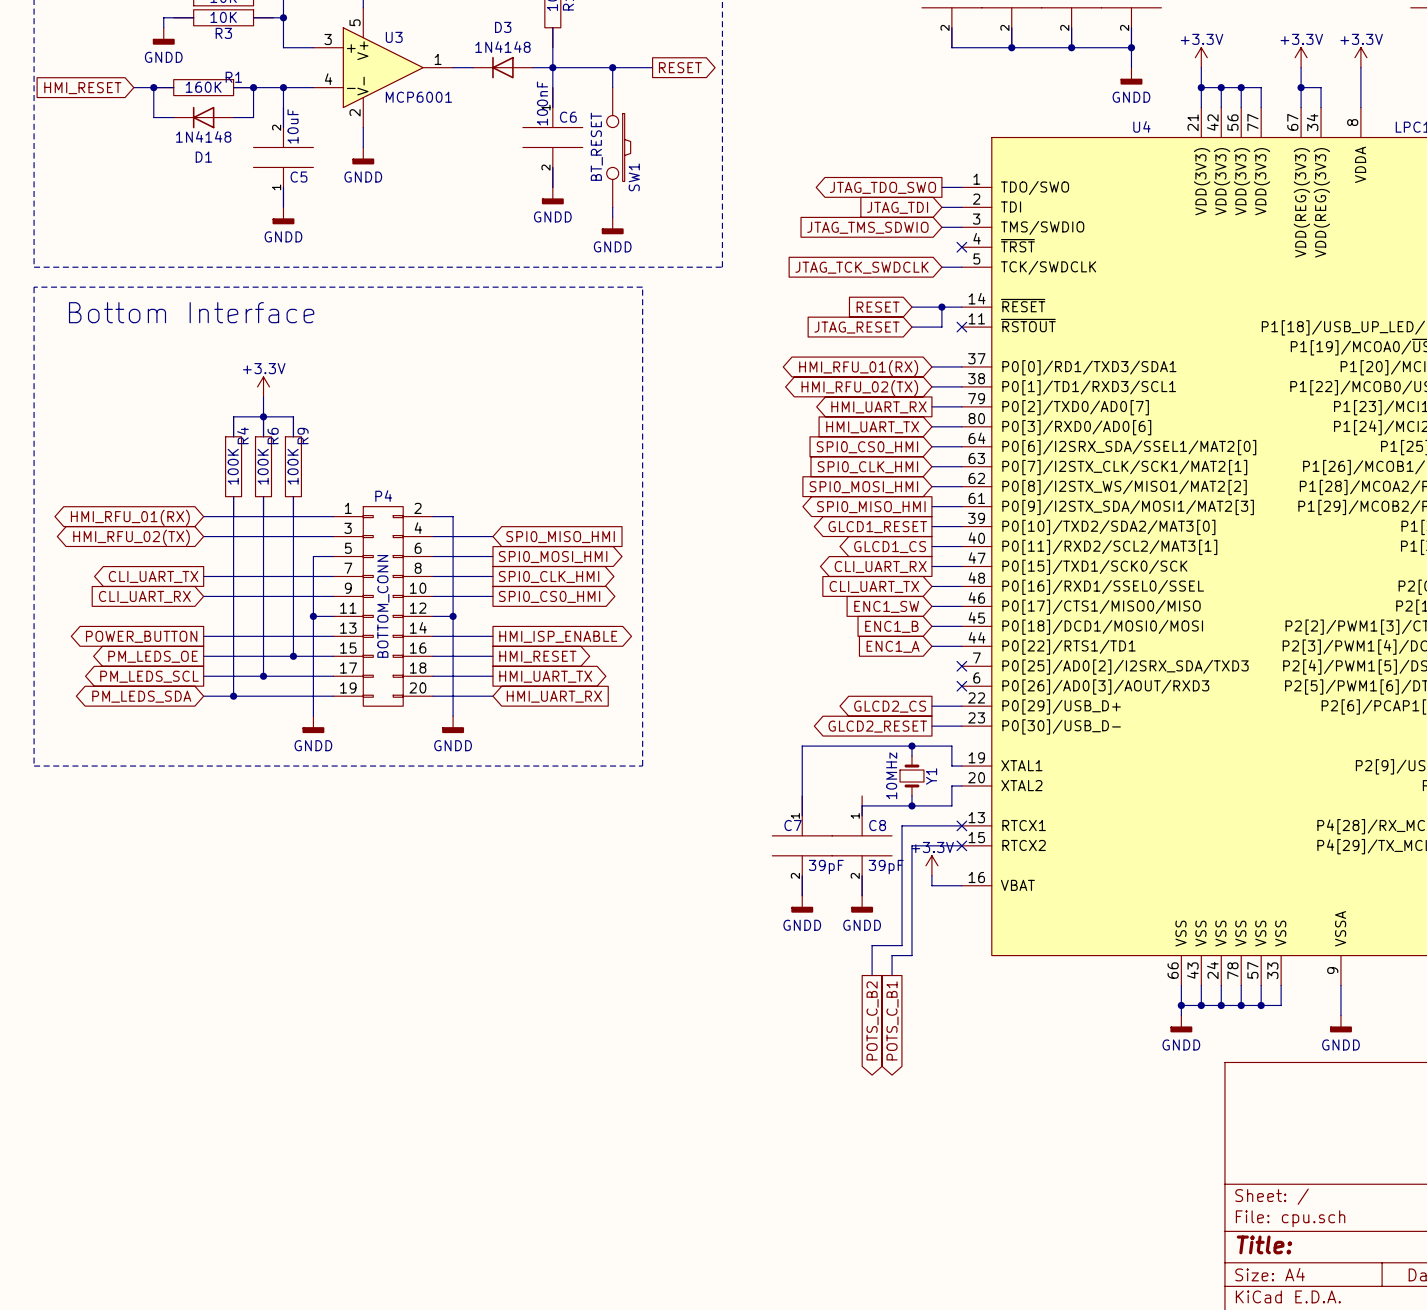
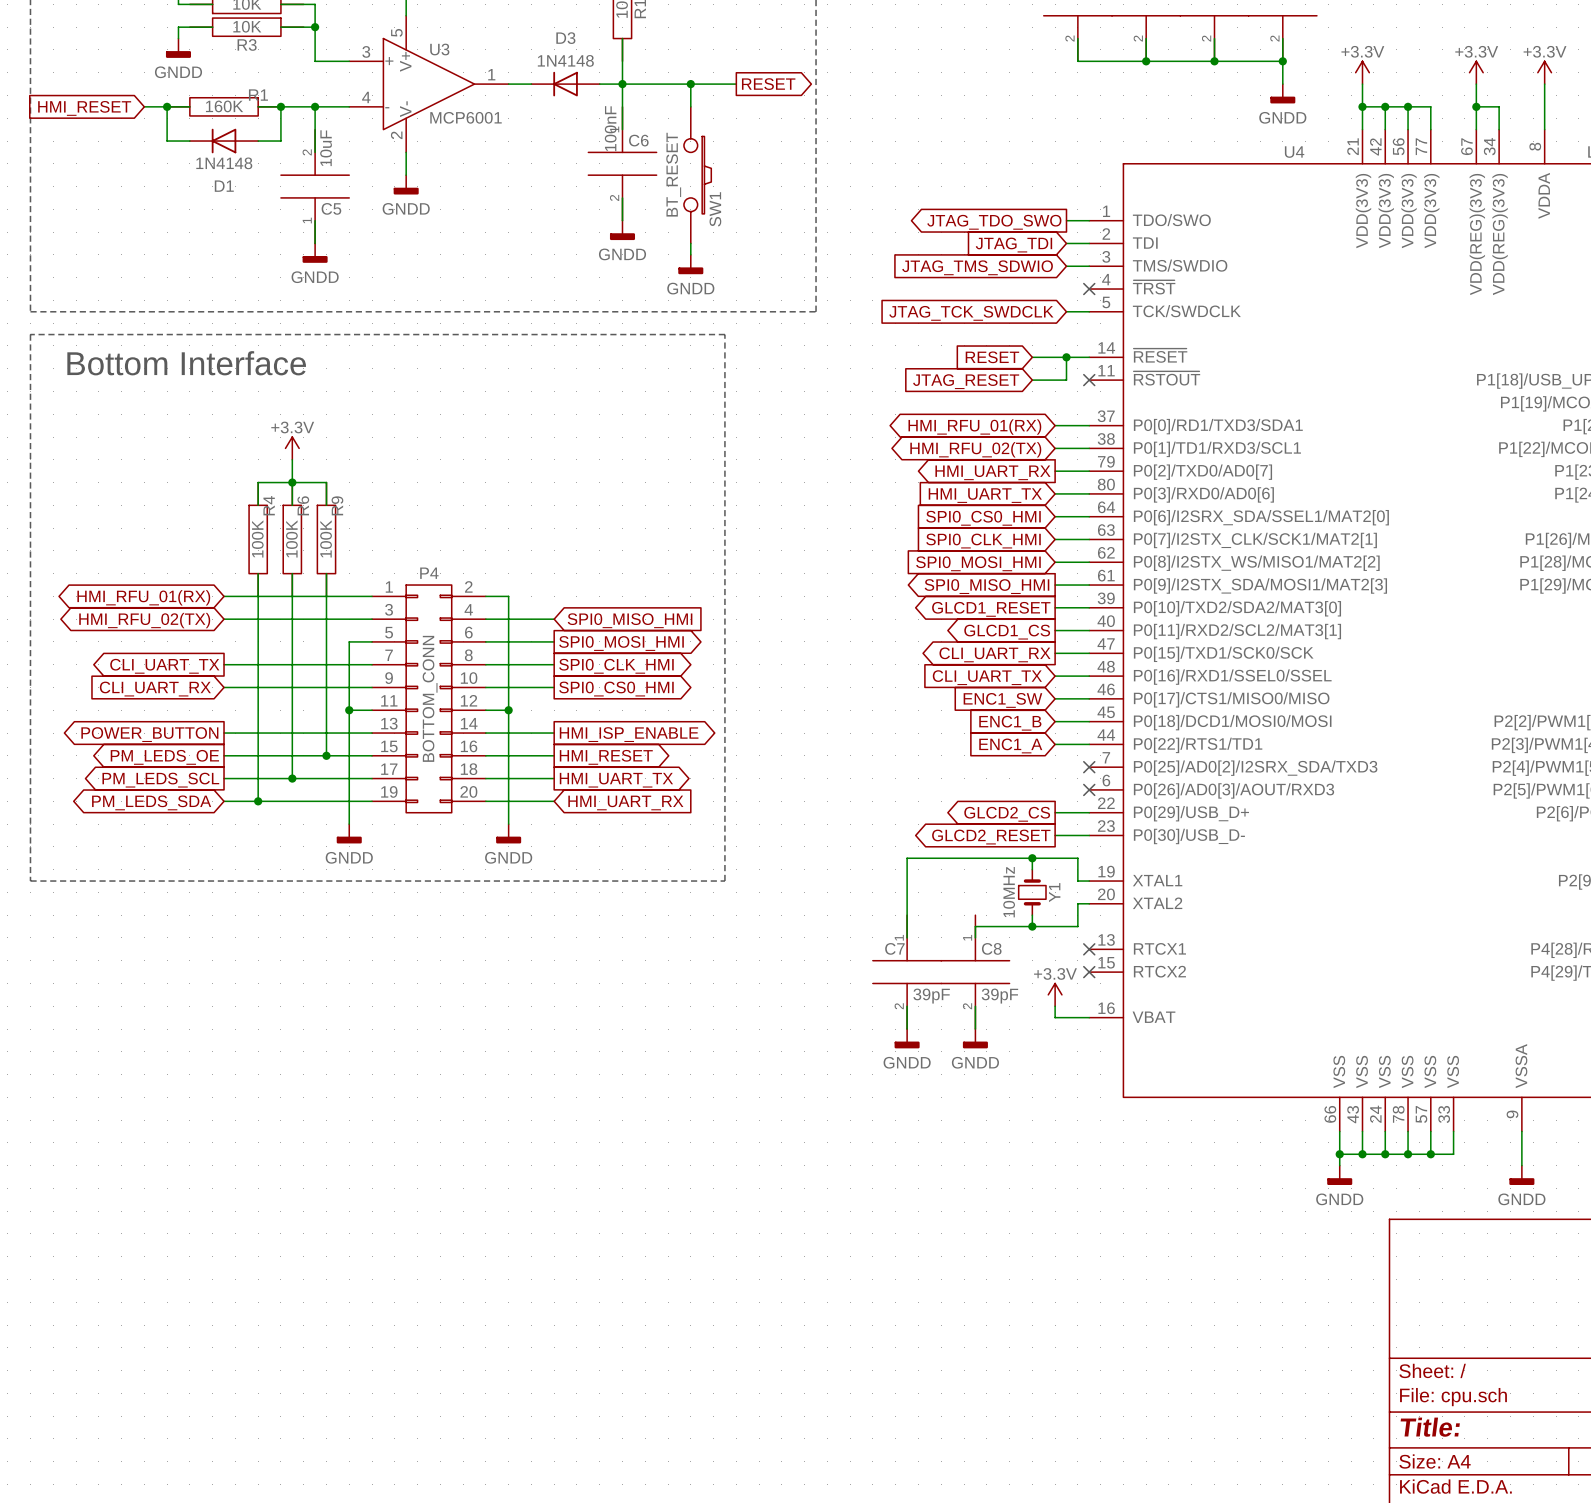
wire: (961, 825) (902, 825) (902, 945) (872, 945) (872, 975) -> none
wire: (961, 845) (911, 845) (911, 955) (892, 955) (892, 975) -> none
global label: POTS_C_B2 (872, 1020) -> none
global label: POTS_C_B1 (892, 1020) -> none

